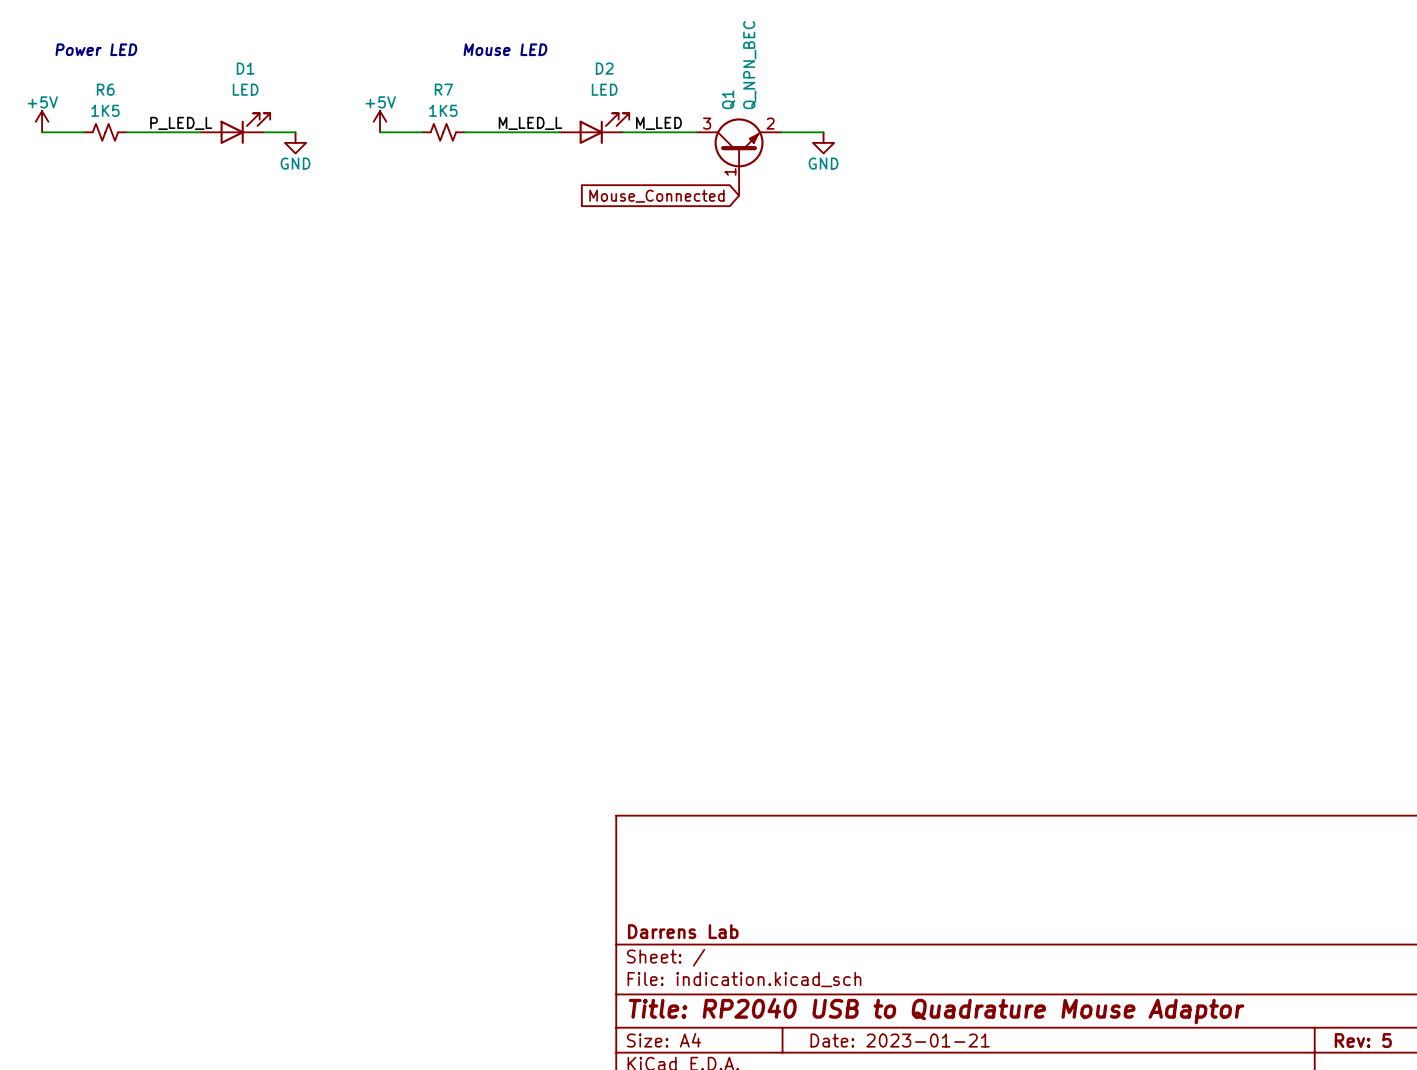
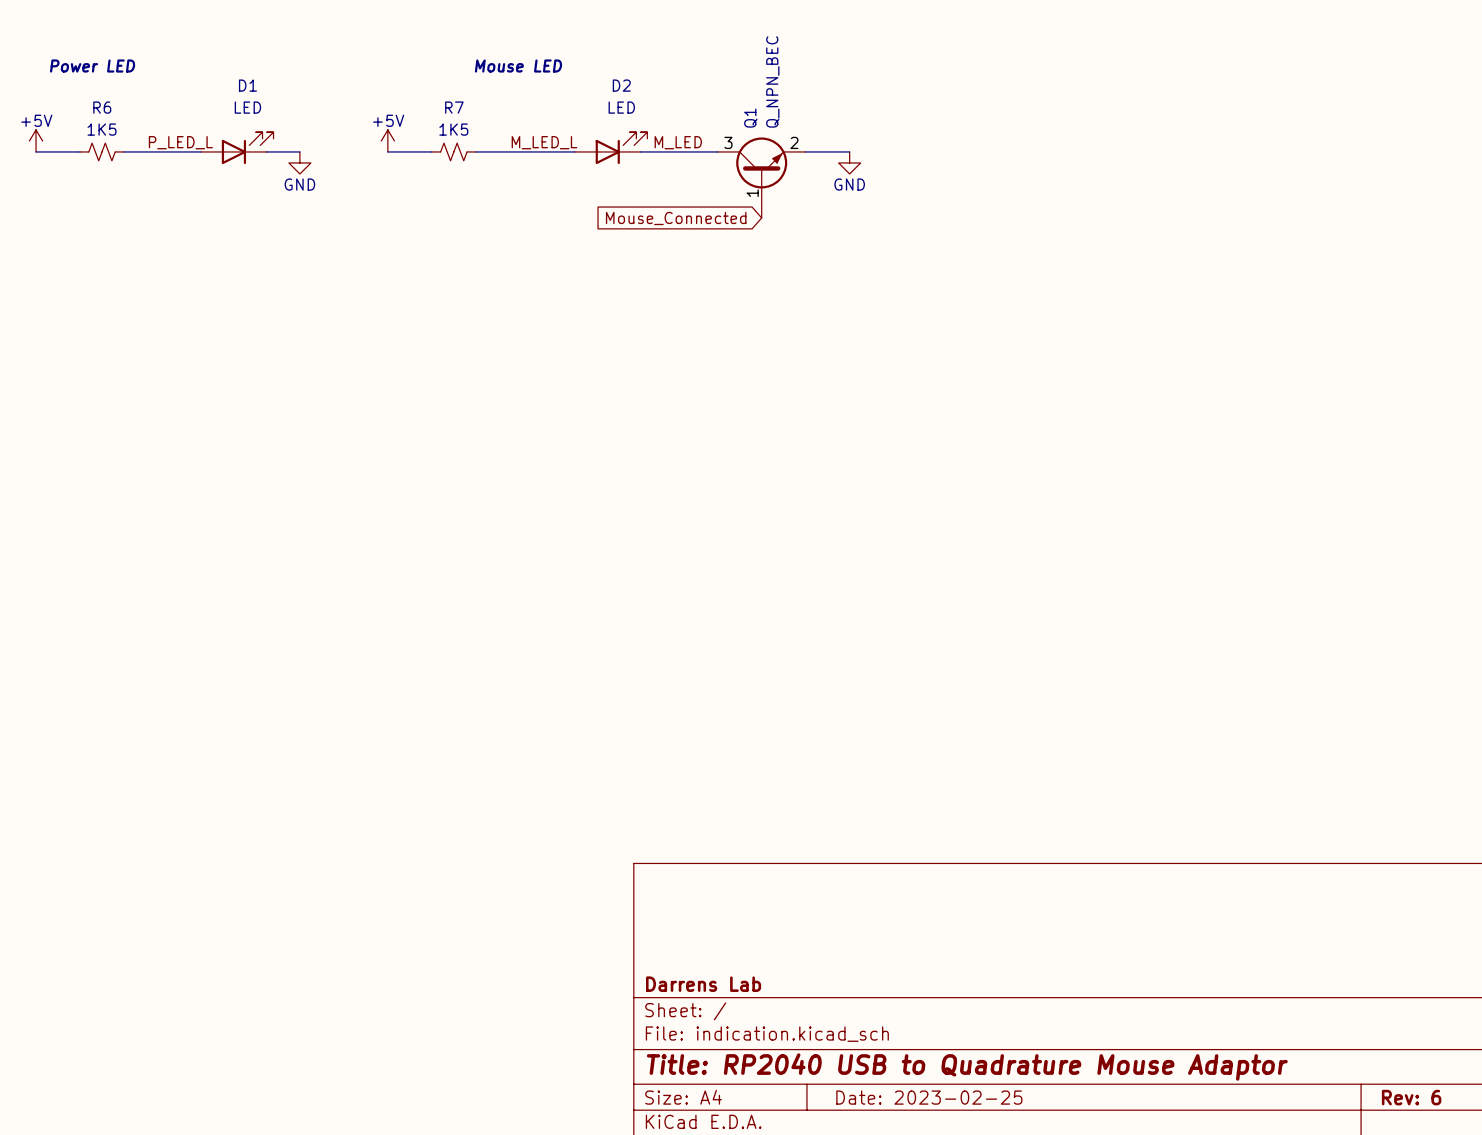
title block: Date: 2023-01-21 (900, 1040) -> Date: 2023-02-25 (929, 1097)
title block: Rev: 5 (1363, 1040) -> Rev: 6 (1411, 1097)

